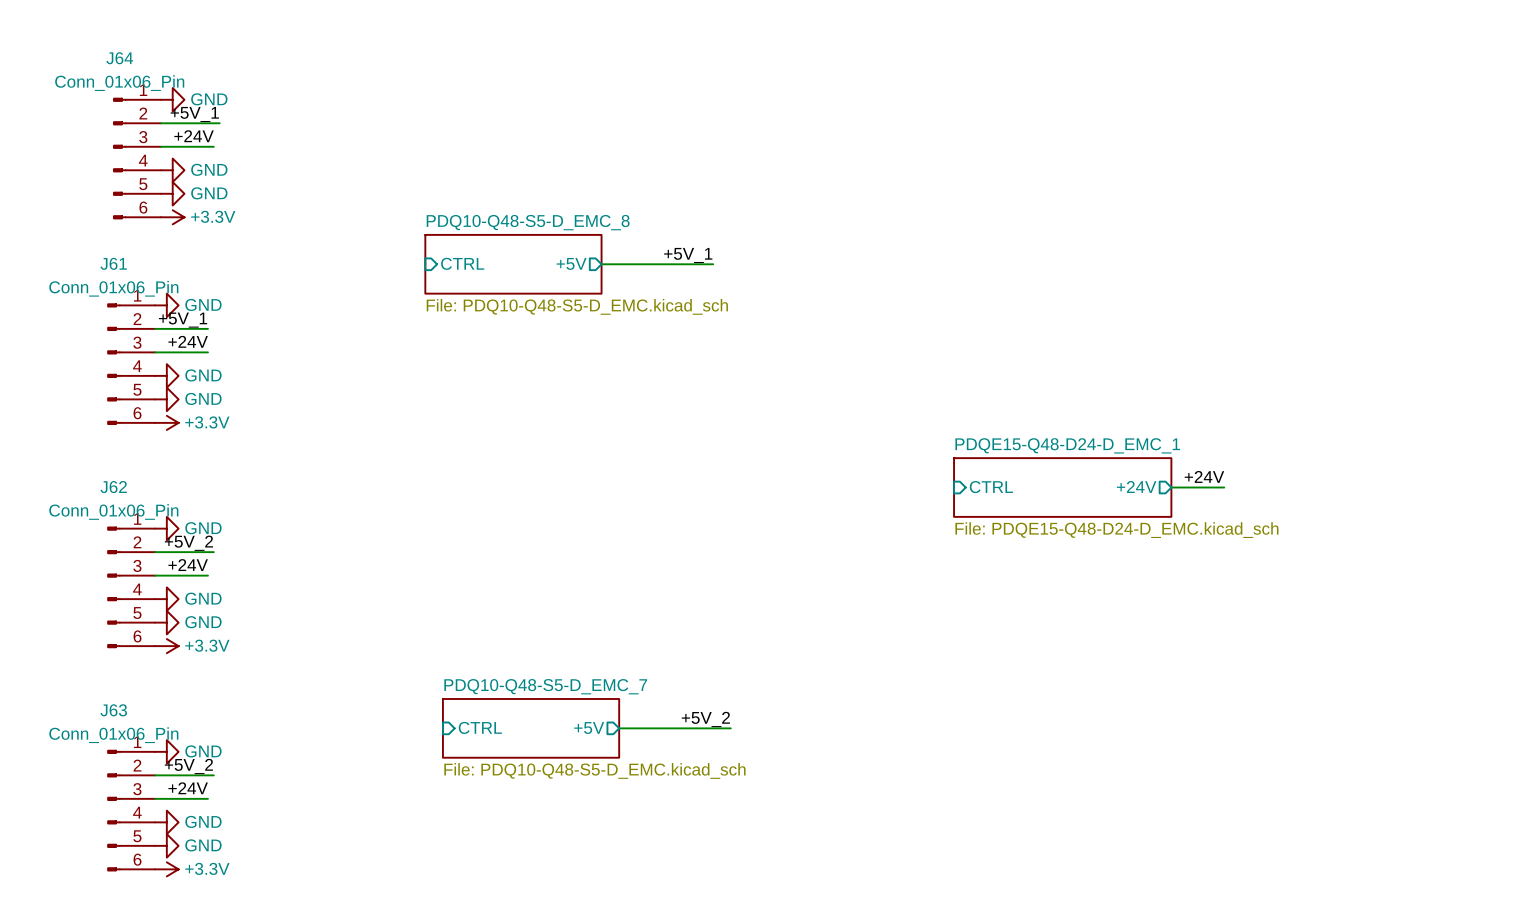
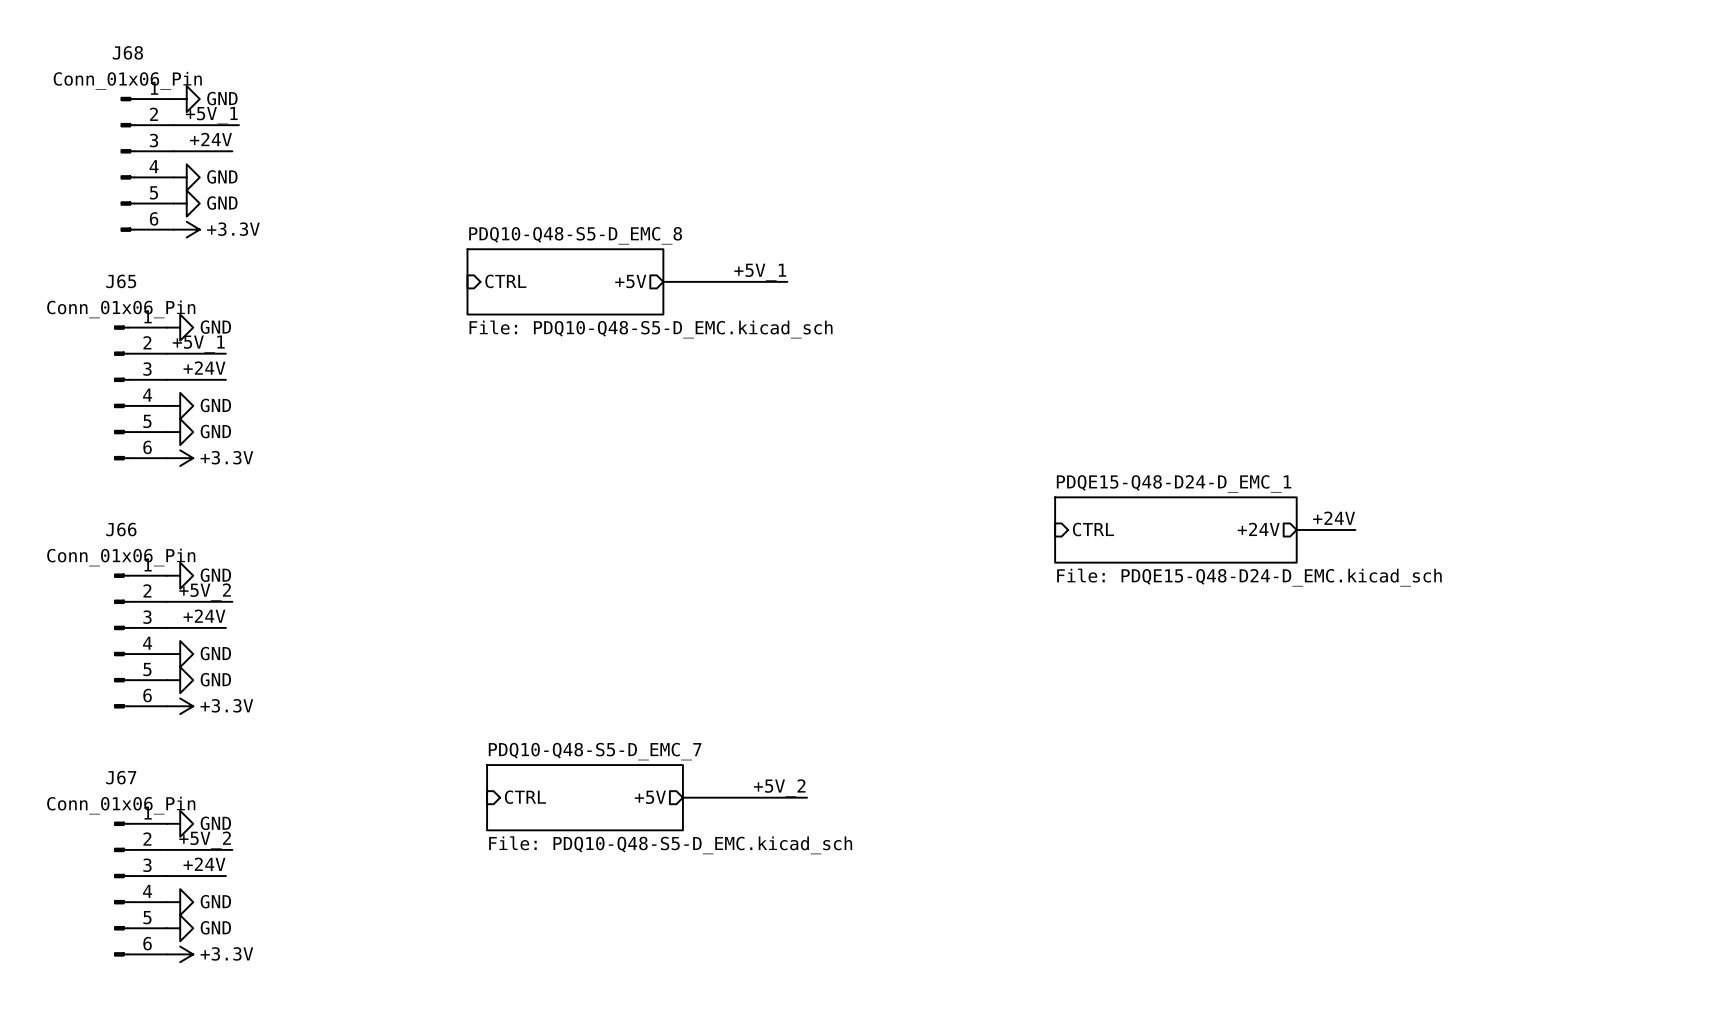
J64 name: J64 (119, 58) -> J68 (127, 52)
J61 name: J61 (113, 263) -> J65 (121, 281)
J62 name: J62 (113, 487) -> J66 (121, 529)
J63 name: J63 (113, 710) -> J67 (121, 777)

